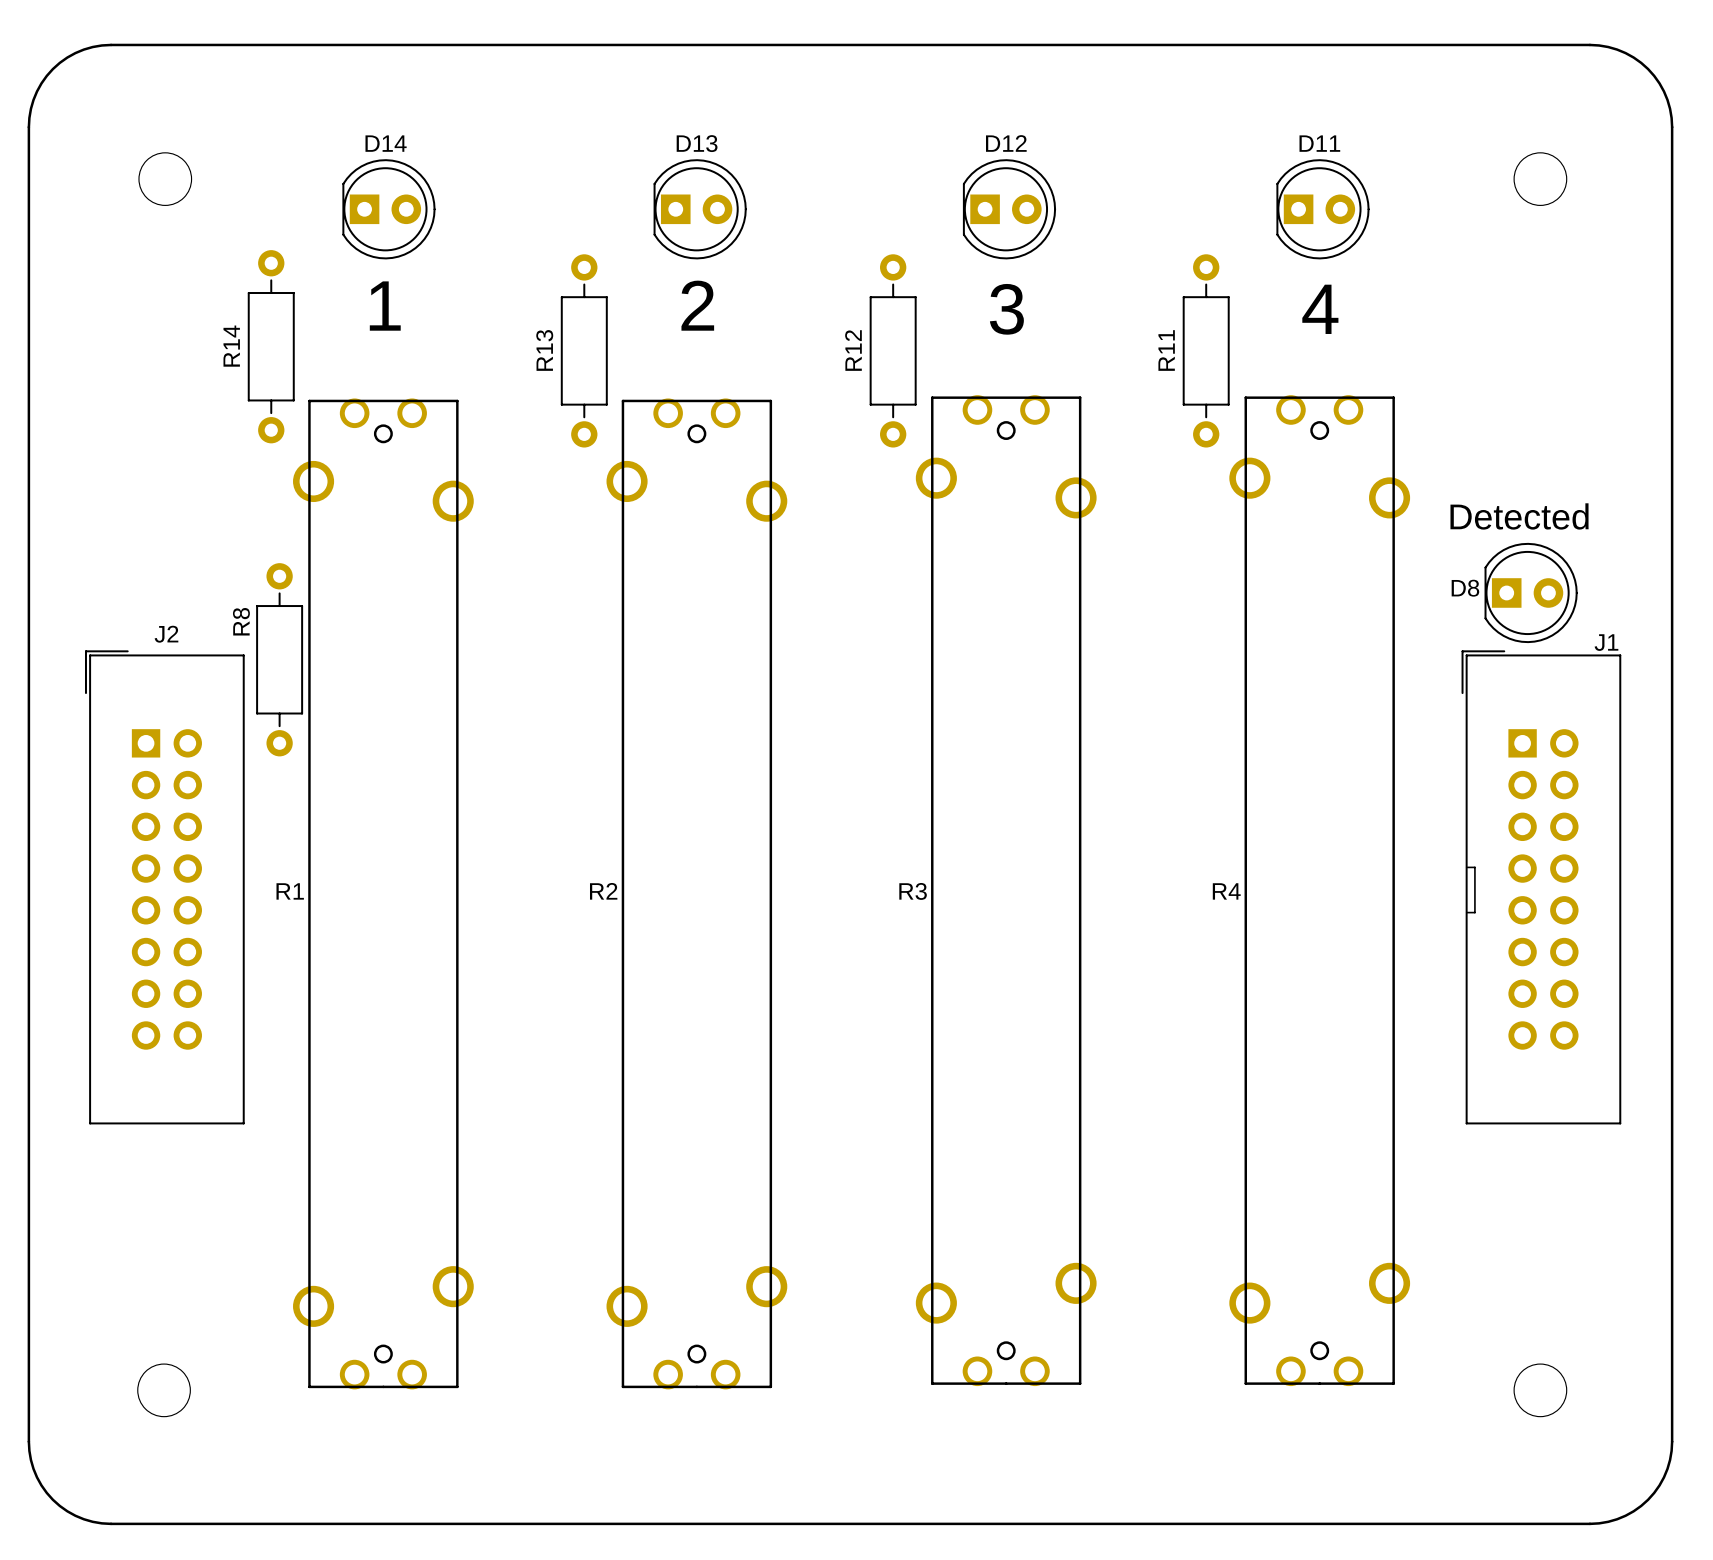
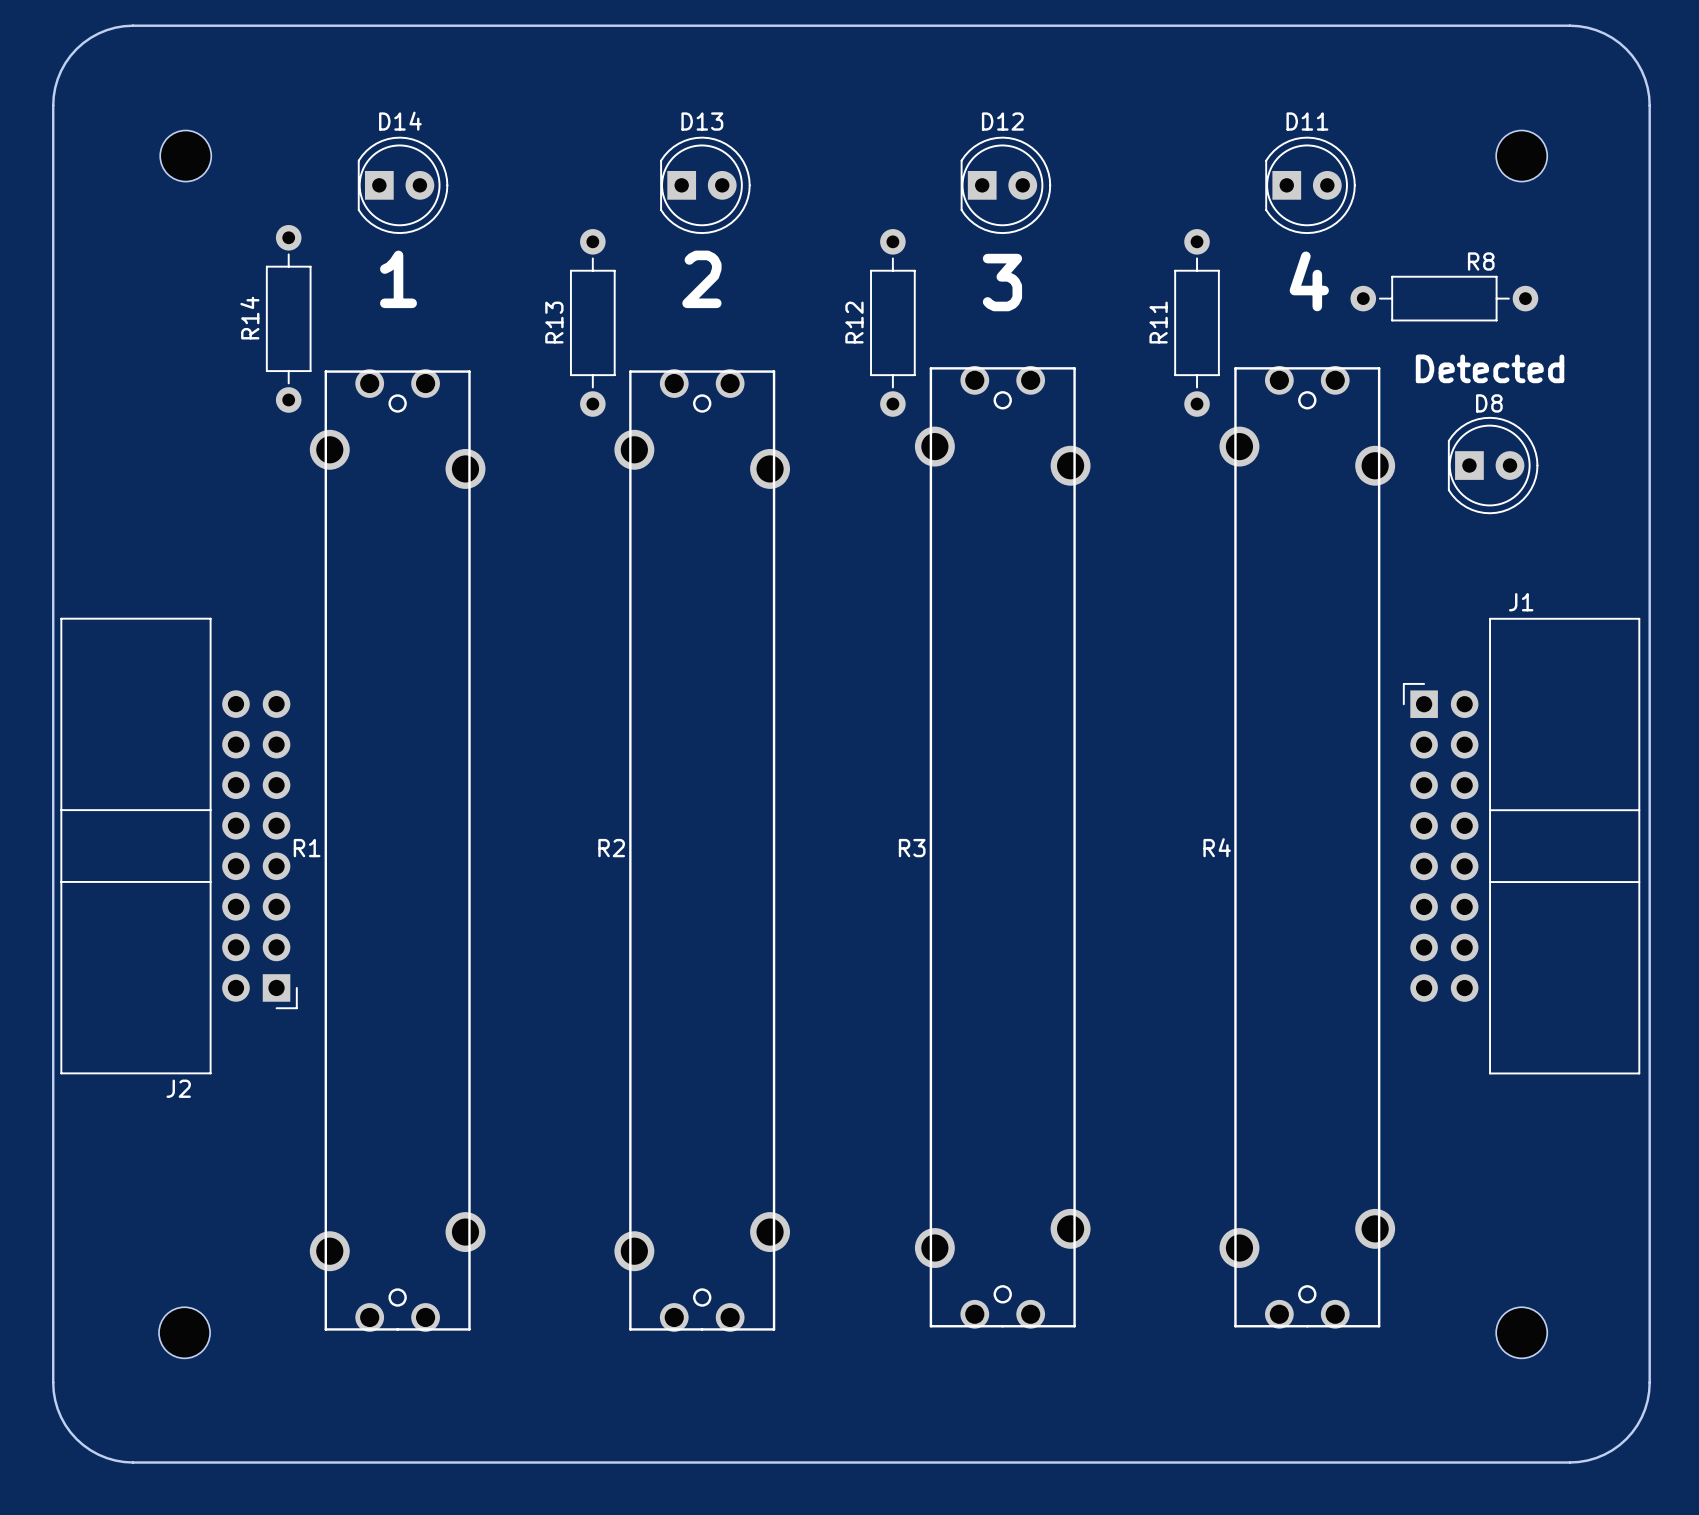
text position: Detected (1519, 516) -> Detected (1490, 368)
D8 name position: D8 (1465, 588) -> D8 (1489, 403)
D8 position: (1531, 592) -> (1493, 465)
J2 name position: J2 (166, 634) -> J2 (178, 1088)
J1 name position: J1 (1606, 642) -> J1 (1521, 602)
J2 footprint: [85, 650, 245, 1125] -> [60, 617, 298, 1075]
J1 footprint: [1461, 650, 1622, 1125] -> [1402, 617, 1641, 1075]
R8 rotation: 0° (279, 659) -> 90° clockwise (1444, 298)
R8 position: (279, 659) -> (1444, 298)
line: (1466, 867) (1474, 867) (1474, 912) (1466, 912) -> none

